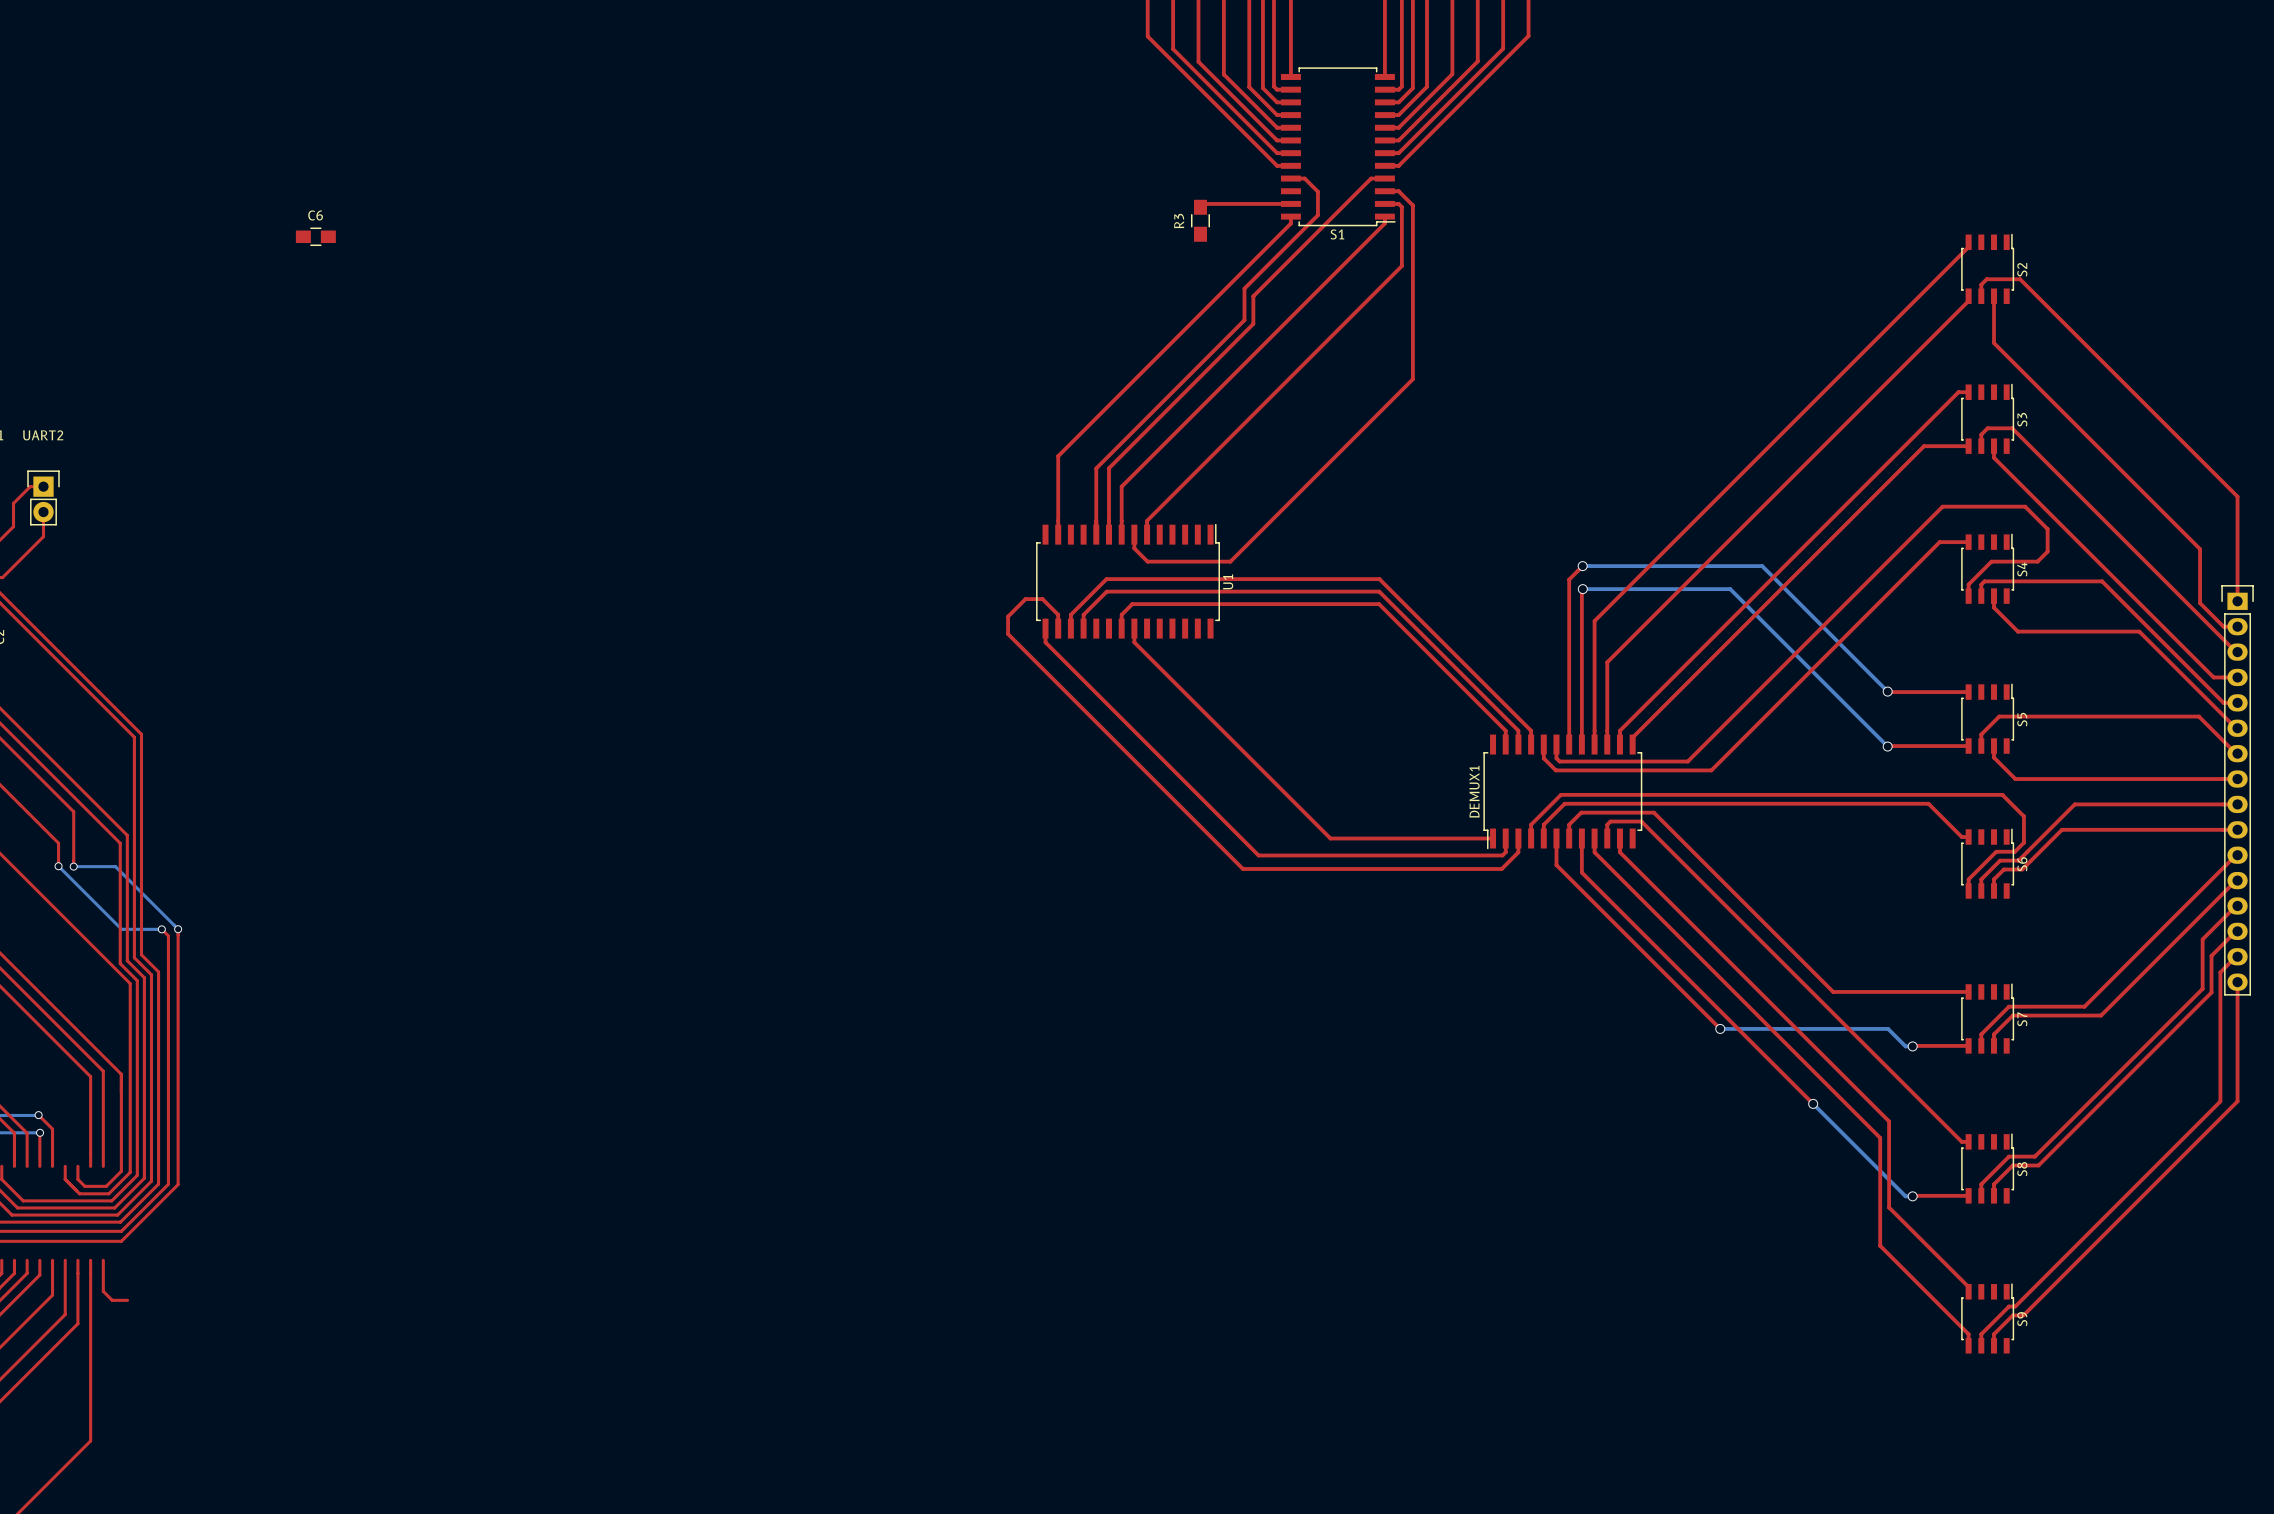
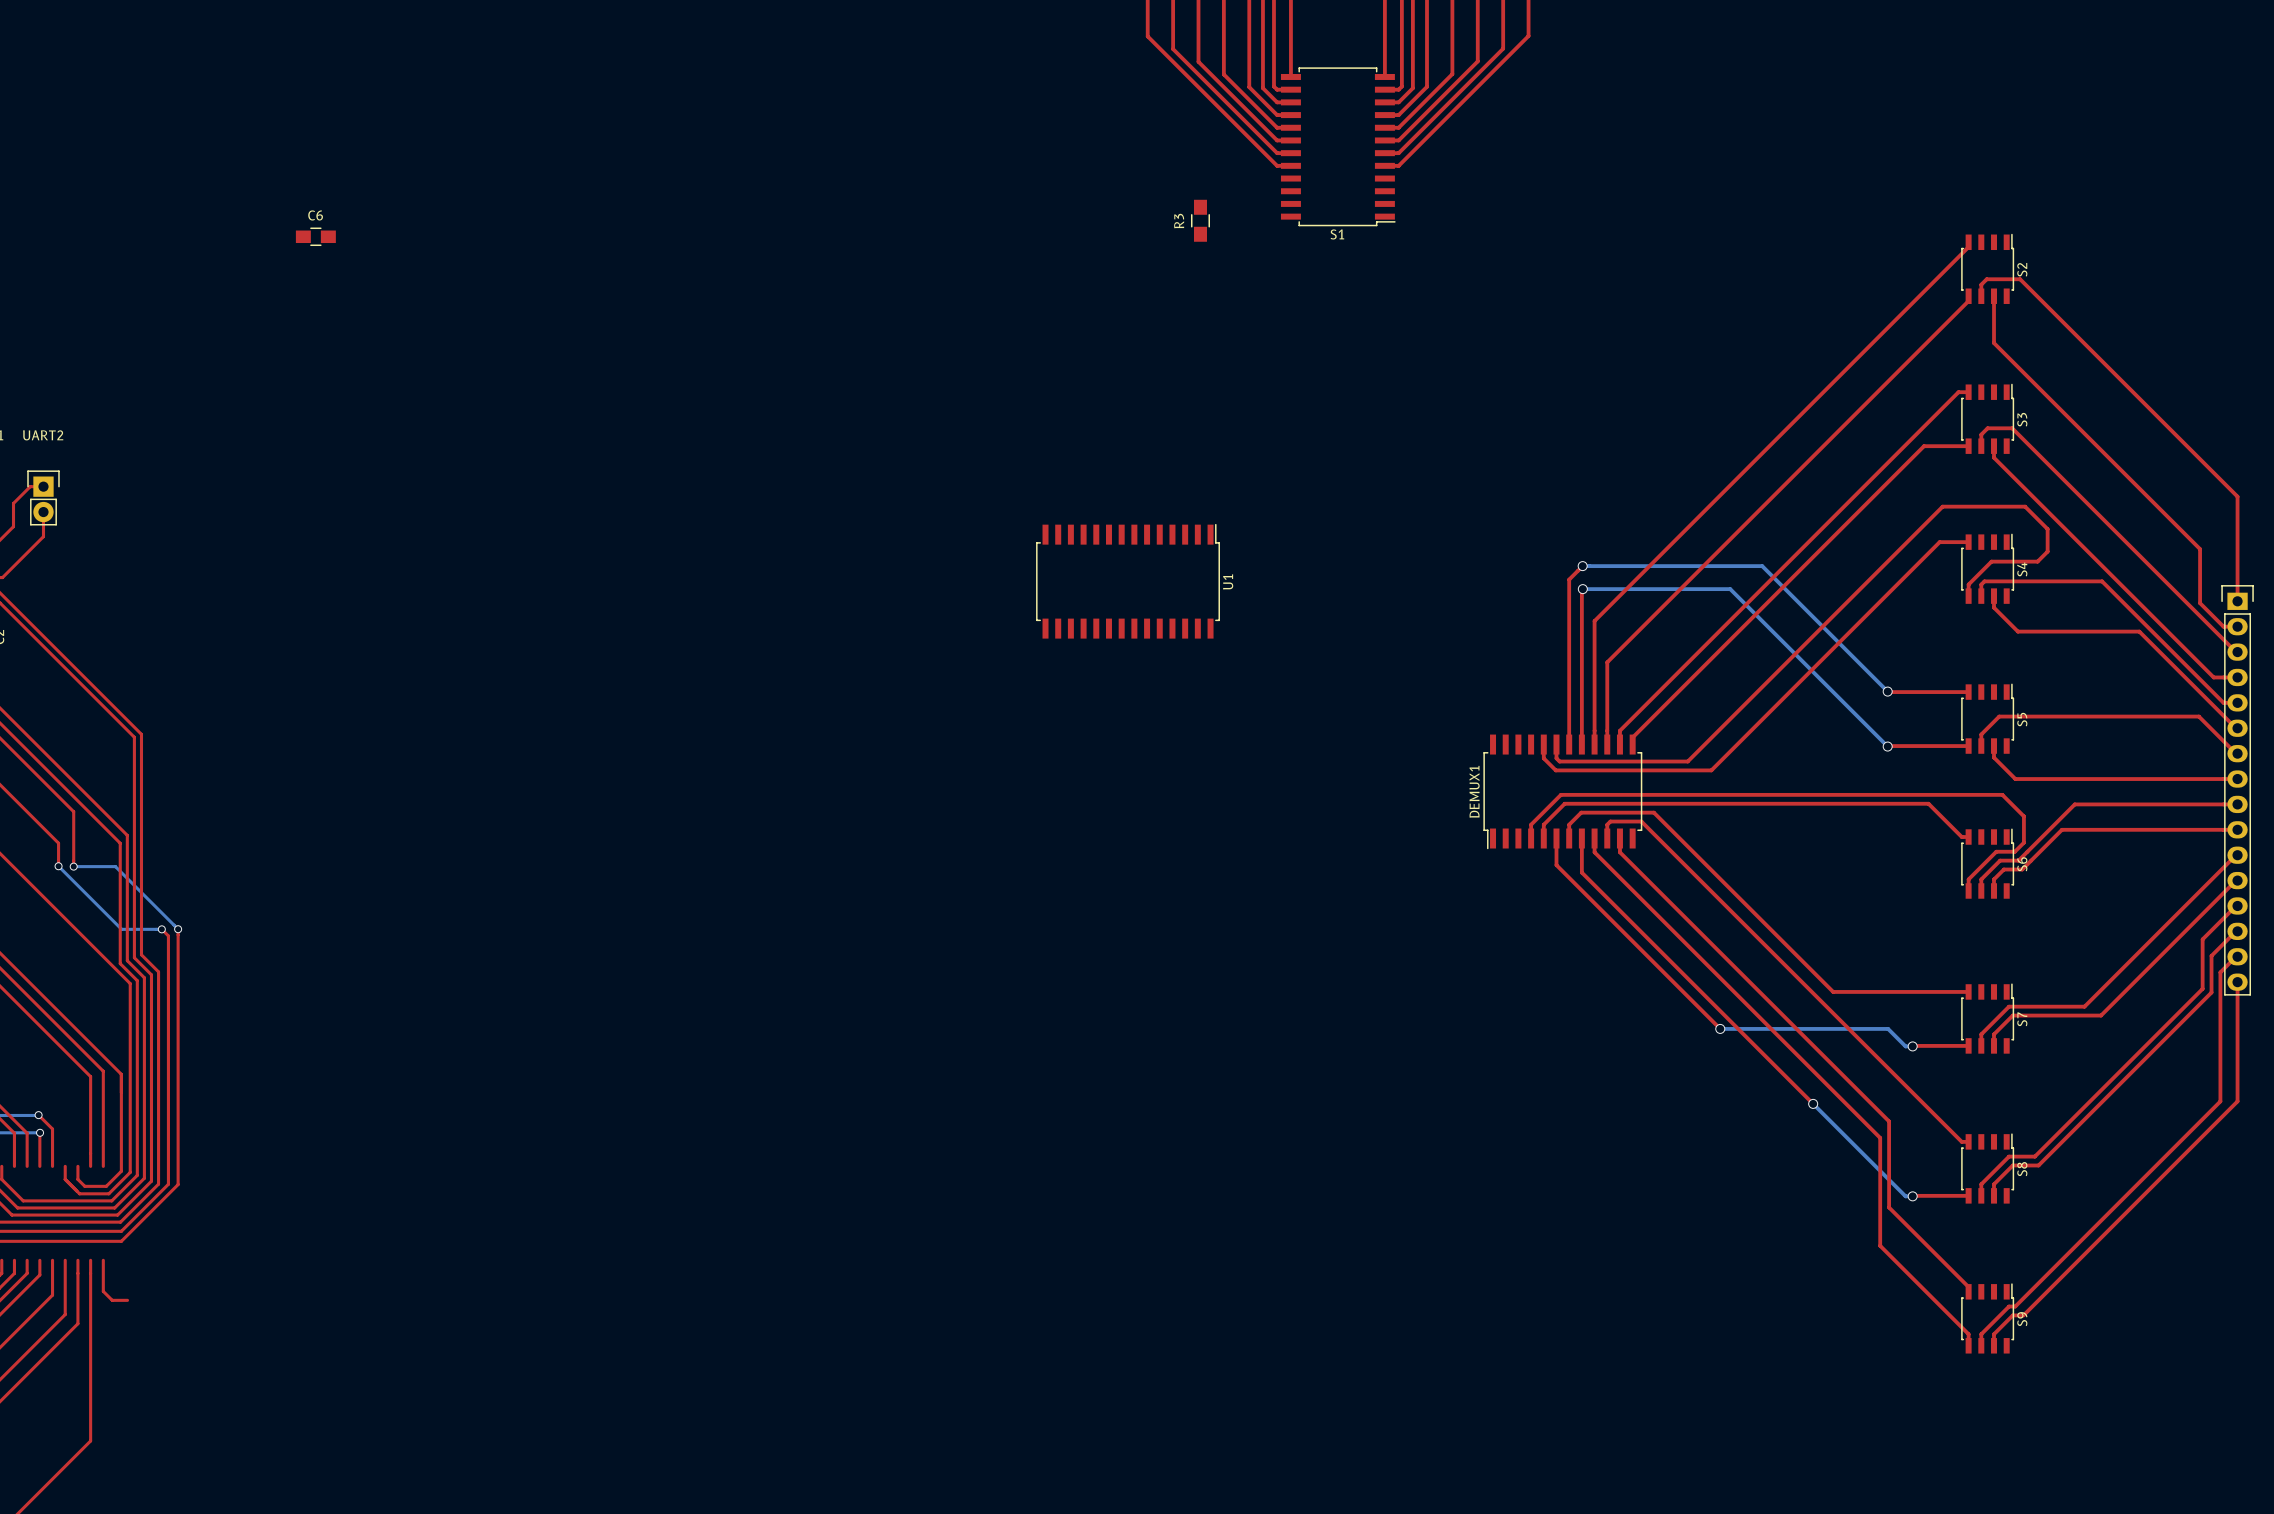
top track: (1290, 178) (1304, 178) (1317, 191) (1317, 215) (1244, 288) (1244, 320) (1096, 468) (1096, 534) -> none
top track: (1384, 178) (1371, 178) (1253, 296) (1253, 323) (1108, 468) (1108, 534) -> none
top track: (1384, 191) (1398, 191) (1412, 205) (1412, 379) (1230, 561) (1147, 561) (1134, 548) (1134, 534) -> none
top track: (1290, 203) (1203, 203) (1200, 207) -> none
top track: (1384, 203) (1398, 203) (1401, 207) (1401, 266) (1147, 520) (1147, 534) -> none
top track: (1290, 216) (1290, 223) (1058, 456) (1058, 534) -> none
top track: (1384, 216) (1384, 223) (1121, 486) (1121, 534) -> none
top track: (1045, 628) (1045, 642) (1258, 855) (1502, 855) (1505, 852) (1505, 838) -> none
top track: (1058, 628) (1058, 614) (1042, 599) (1025, 599) (1008, 616) (1008, 634) (1242, 869) (1501, 869) (1518, 852) (1518, 838) -> none
top track: (1070, 628) (1070, 614) (1106, 579) (1379, 579) (1531, 730) (1531, 744) -> none
top track: (1083, 628) (1083, 614) (1106, 591) (1379, 591) (1518, 730) (1518, 744) -> none
top track: (1121, 628) (1121, 614) (1132, 604) (1379, 604) (1505, 730) (1505, 744) -> none
top track: (1134, 628) (1134, 642) (1330, 838) (1493, 838) -> none

